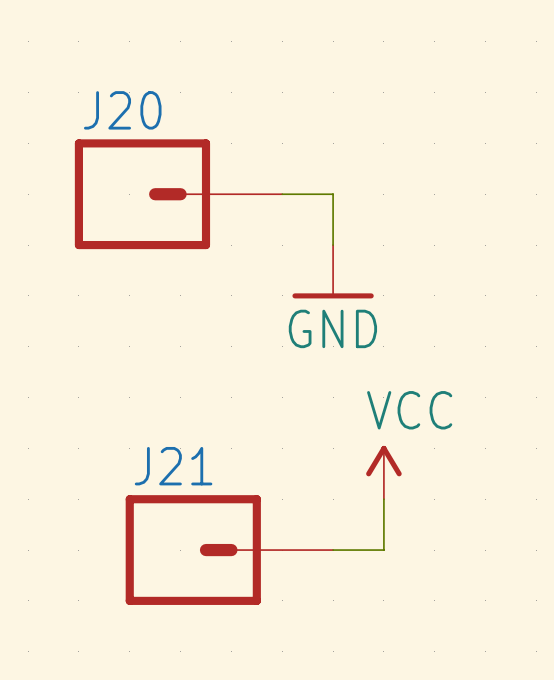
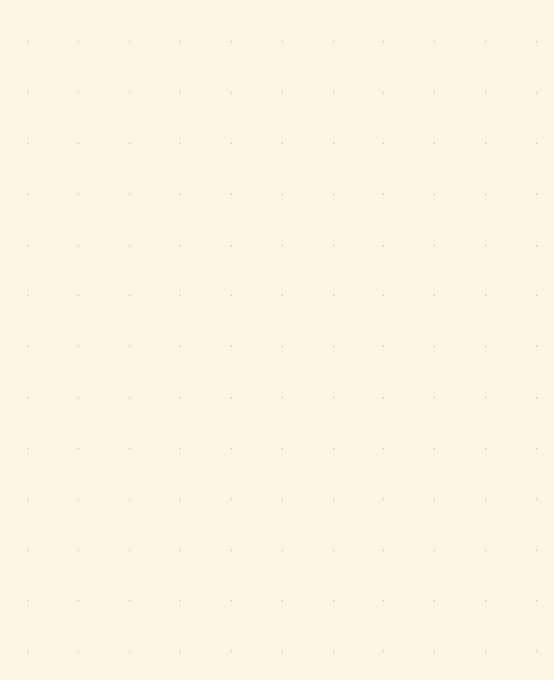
J20: (178, 194) -> none
wire: (282, 194) (333, 194) (333, 245) -> none
power symbol: GND (333, 271) -> none
power symbol: VCC (383, 472) -> none
wire: (383, 499) (383, 550) (333, 550) -> none
J21: (229, 550) -> none

